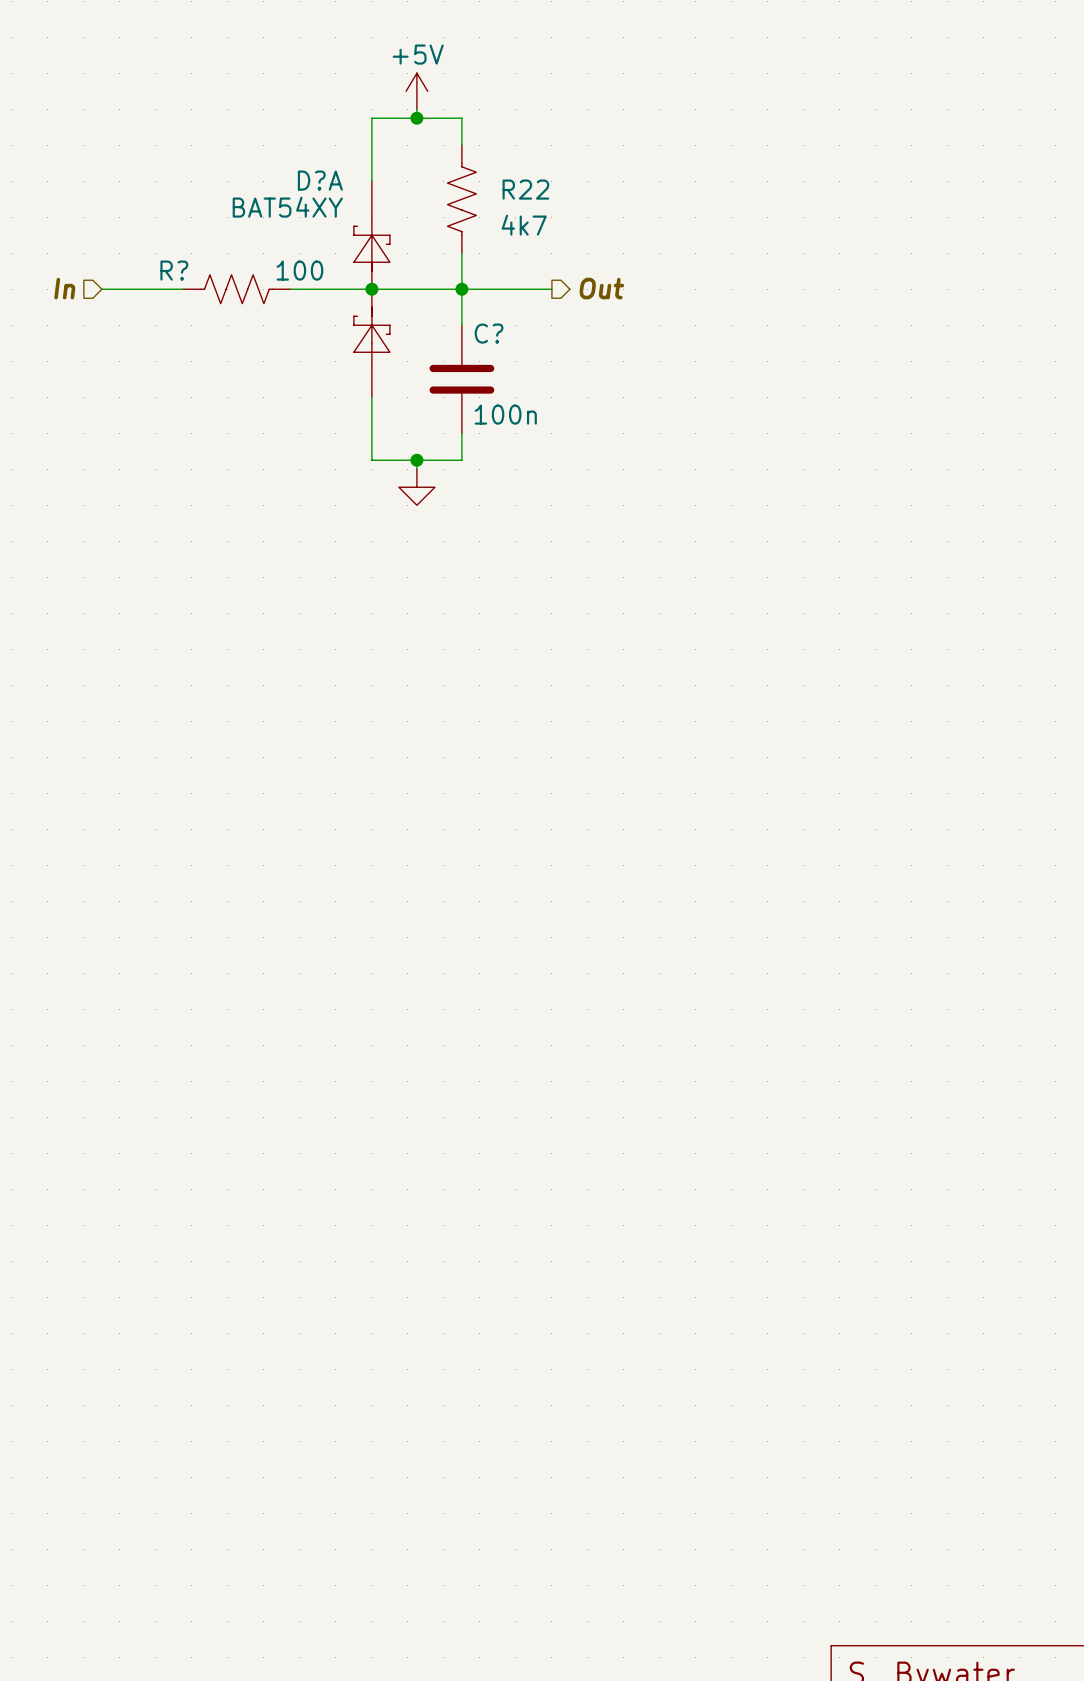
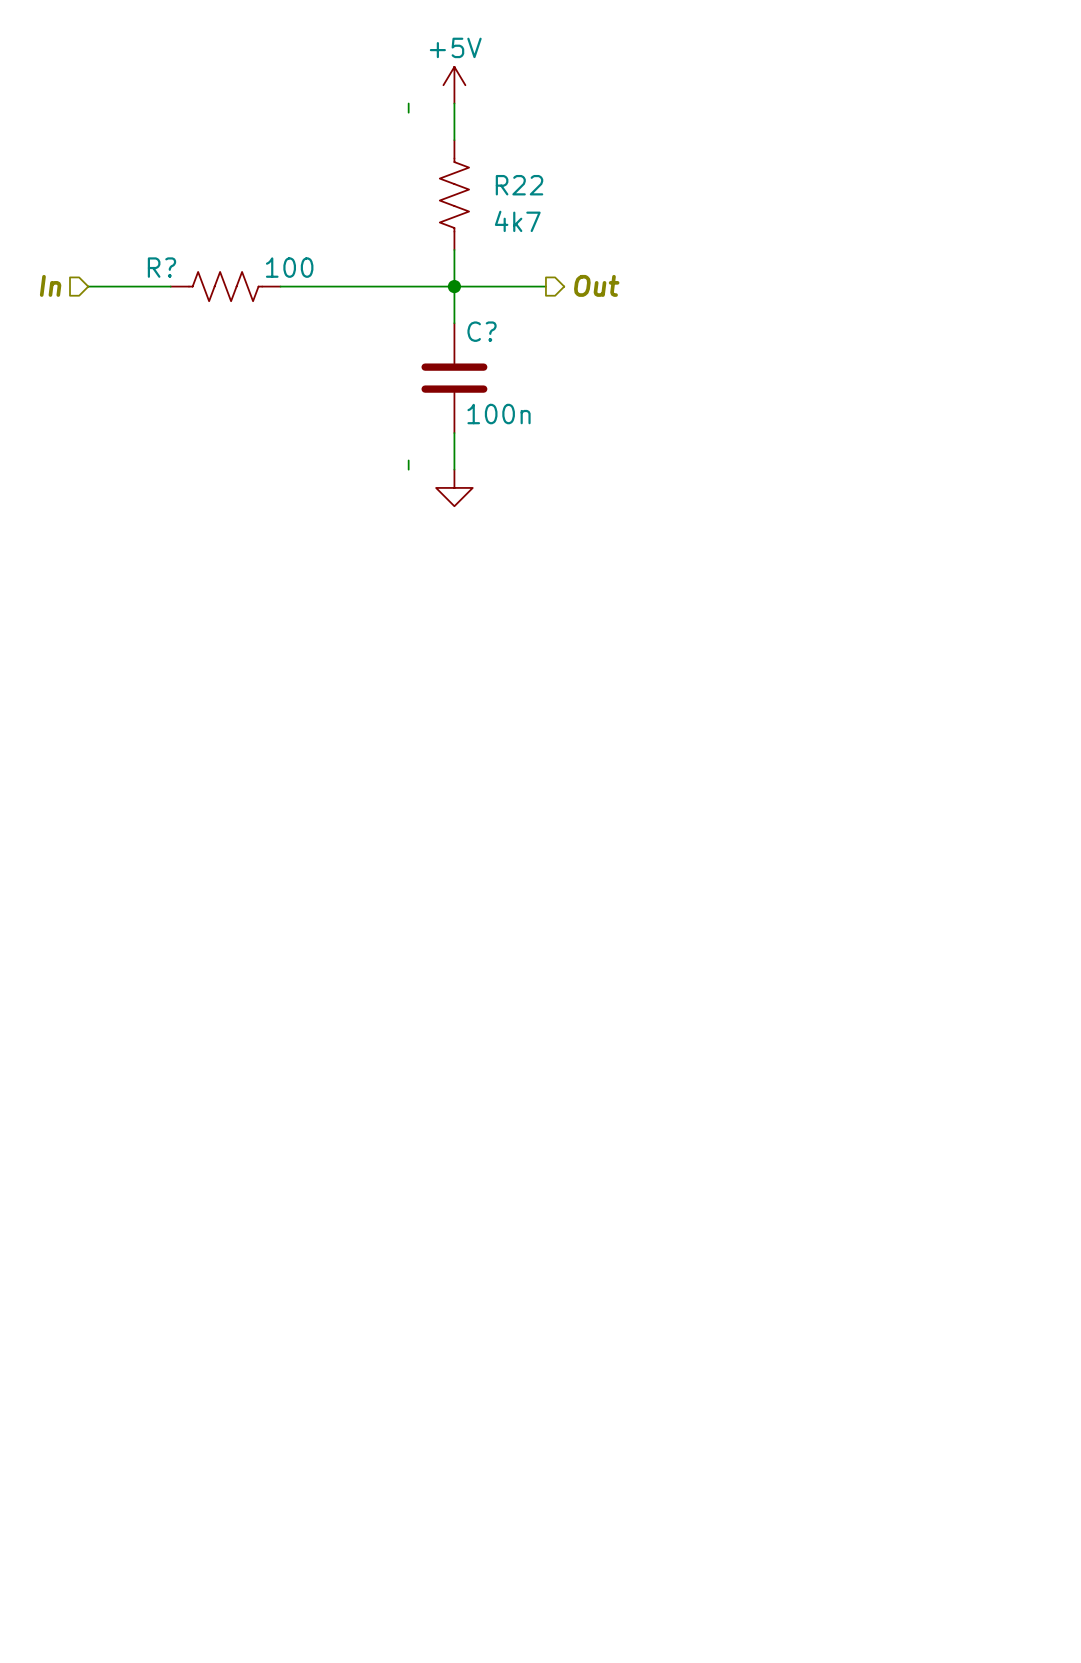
power symbol position: +5V (416, 91) -> +5V (454, 85)
junction: (416, 118) -> none
wire: (461, 118) (371, 118) (371, 181) -> (454, 112) (454, 103)
junction: (371, 289) -> none
D?A: BAT54XY (371, 289) -> none
wire: (371, 397) (371, 460) (461, 460) -> (454, 469) (454, 460)
junction: (416, 460) -> none
power symbol position: (416, 487) -> (454, 487)

